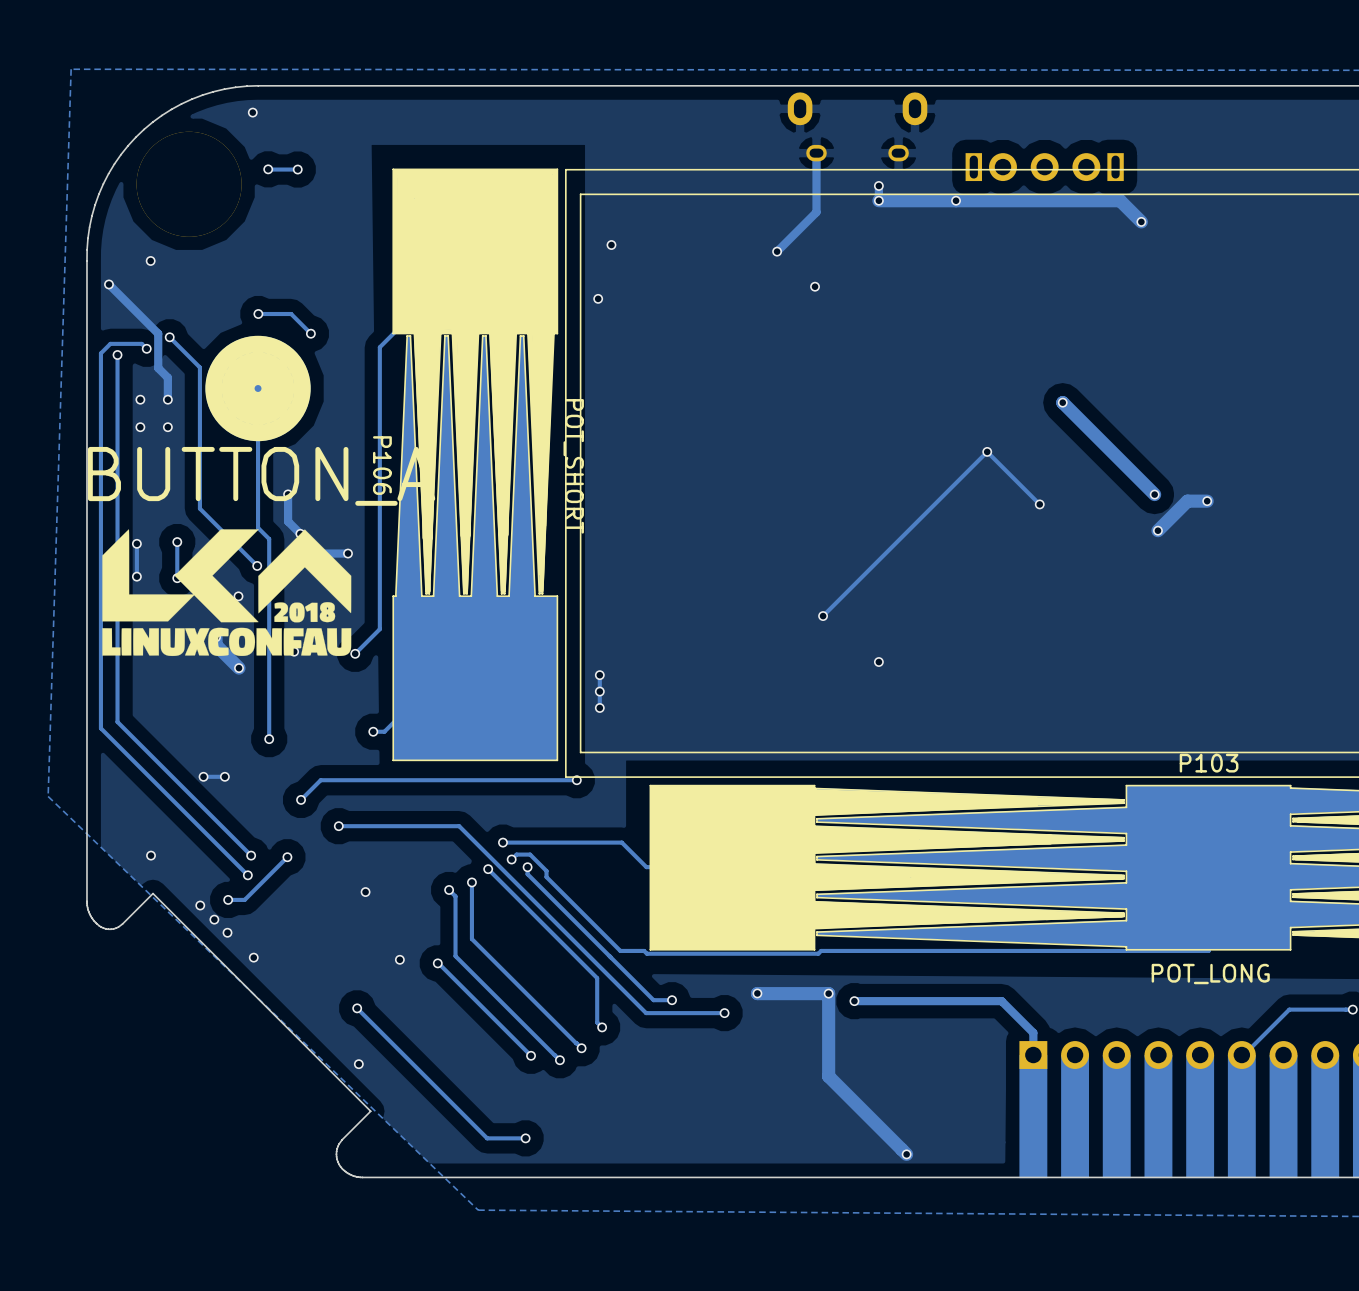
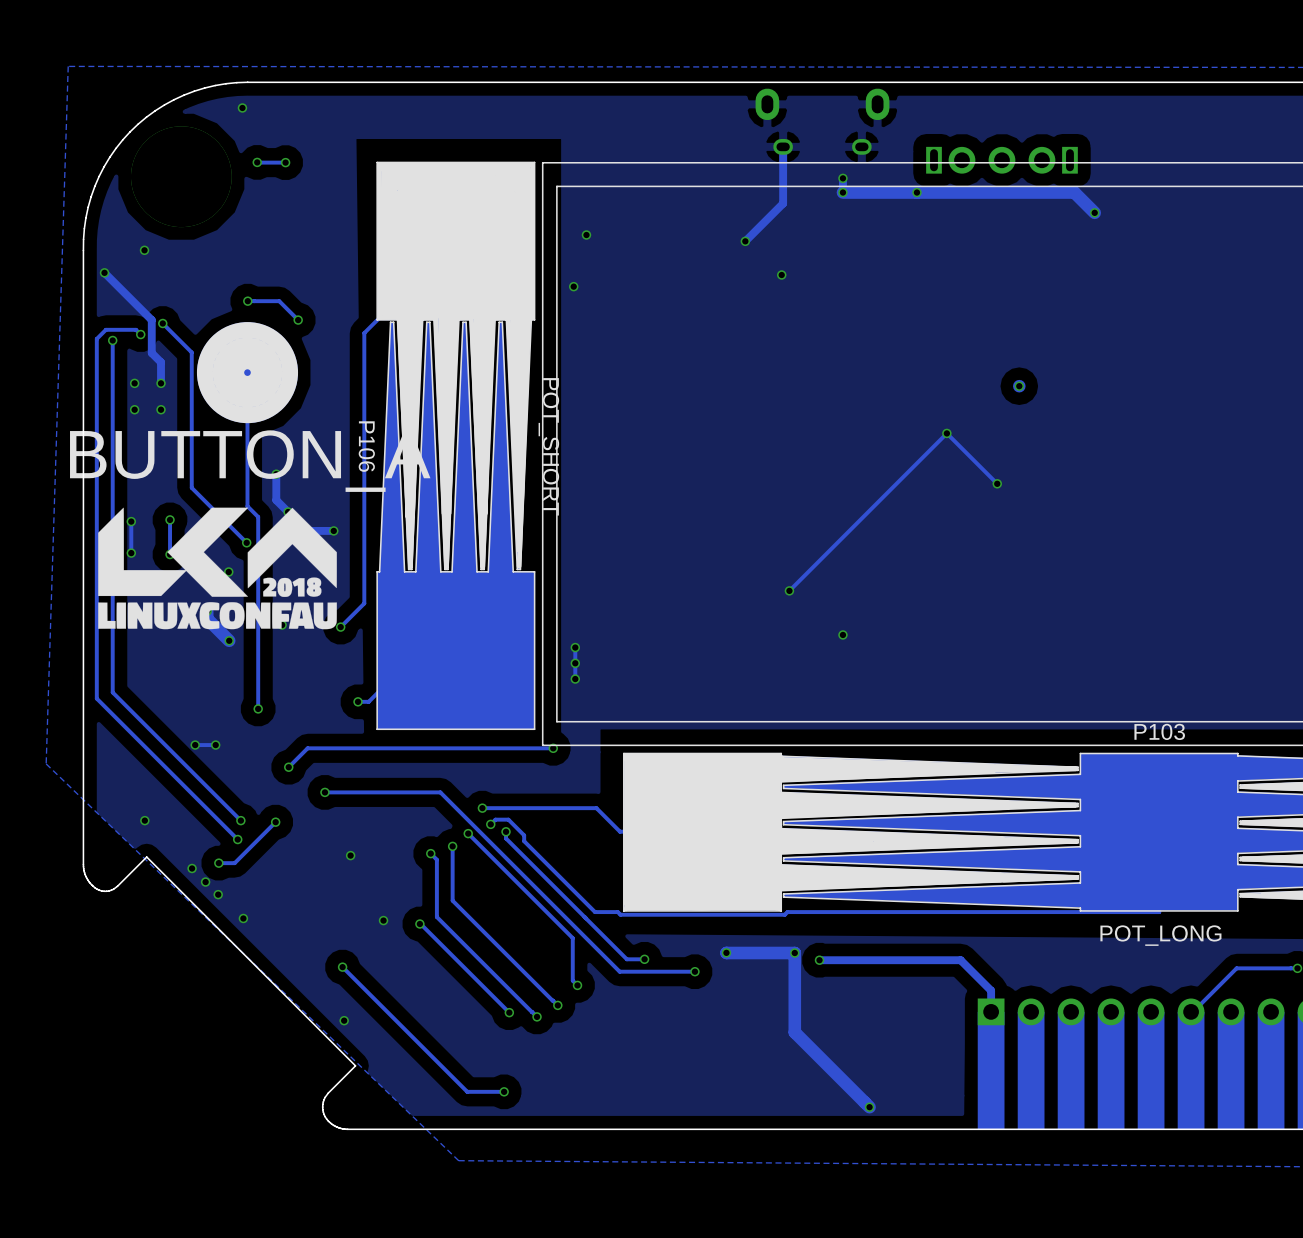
track: (1062, 402) (1154, 494) -> none
via: (1154, 494) -> none
track: (1207, 501) (1187, 501) (1157, 530) -> none
via: (1207, 501) -> none
via: (1157, 530) -> none

